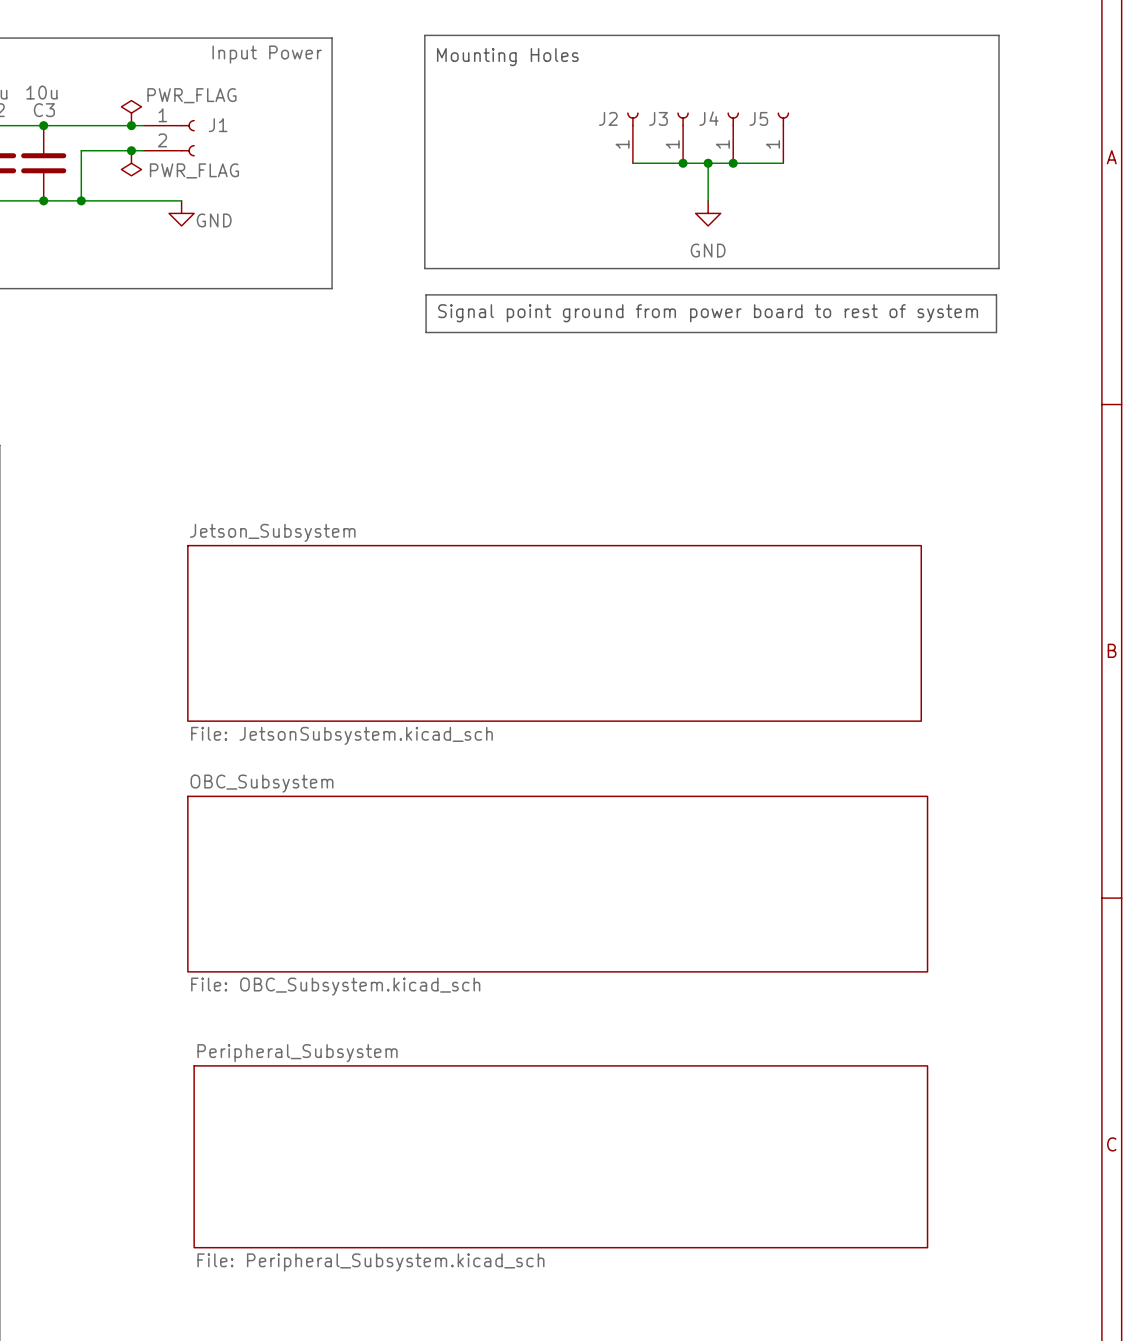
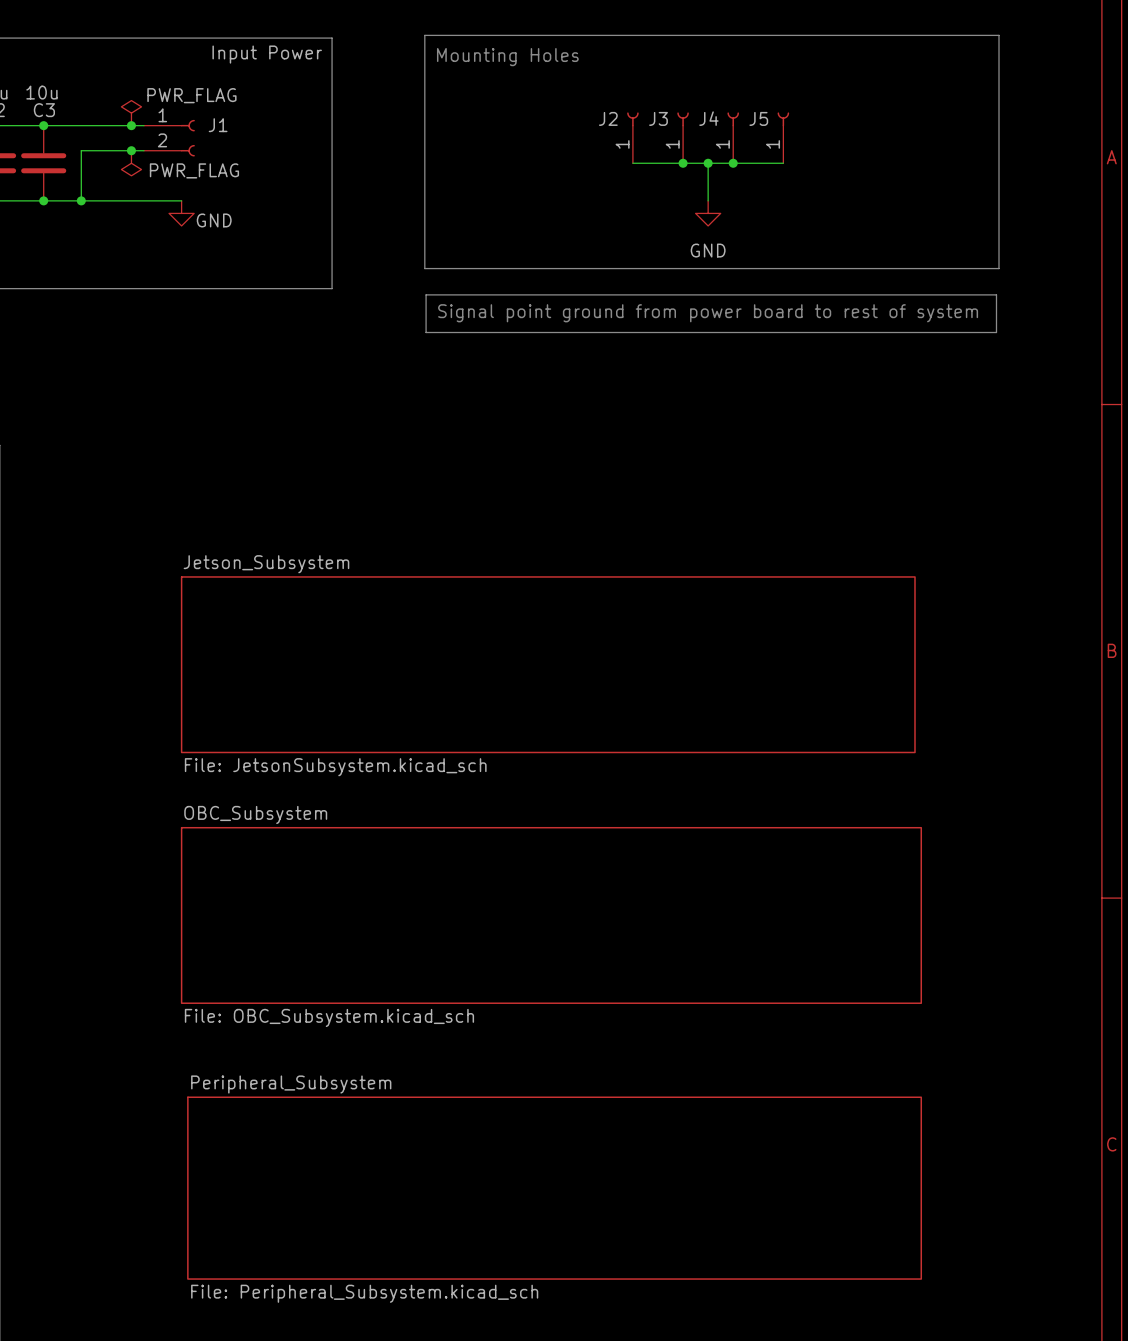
sheet Jetson_Subsystem position: (554, 633) -> (548, 664)
sheet OBC_Subsystem position: (557, 884) -> (551, 915)
sheet Peripheral_Subsystem position: (560, 1156) -> (554, 1188)

